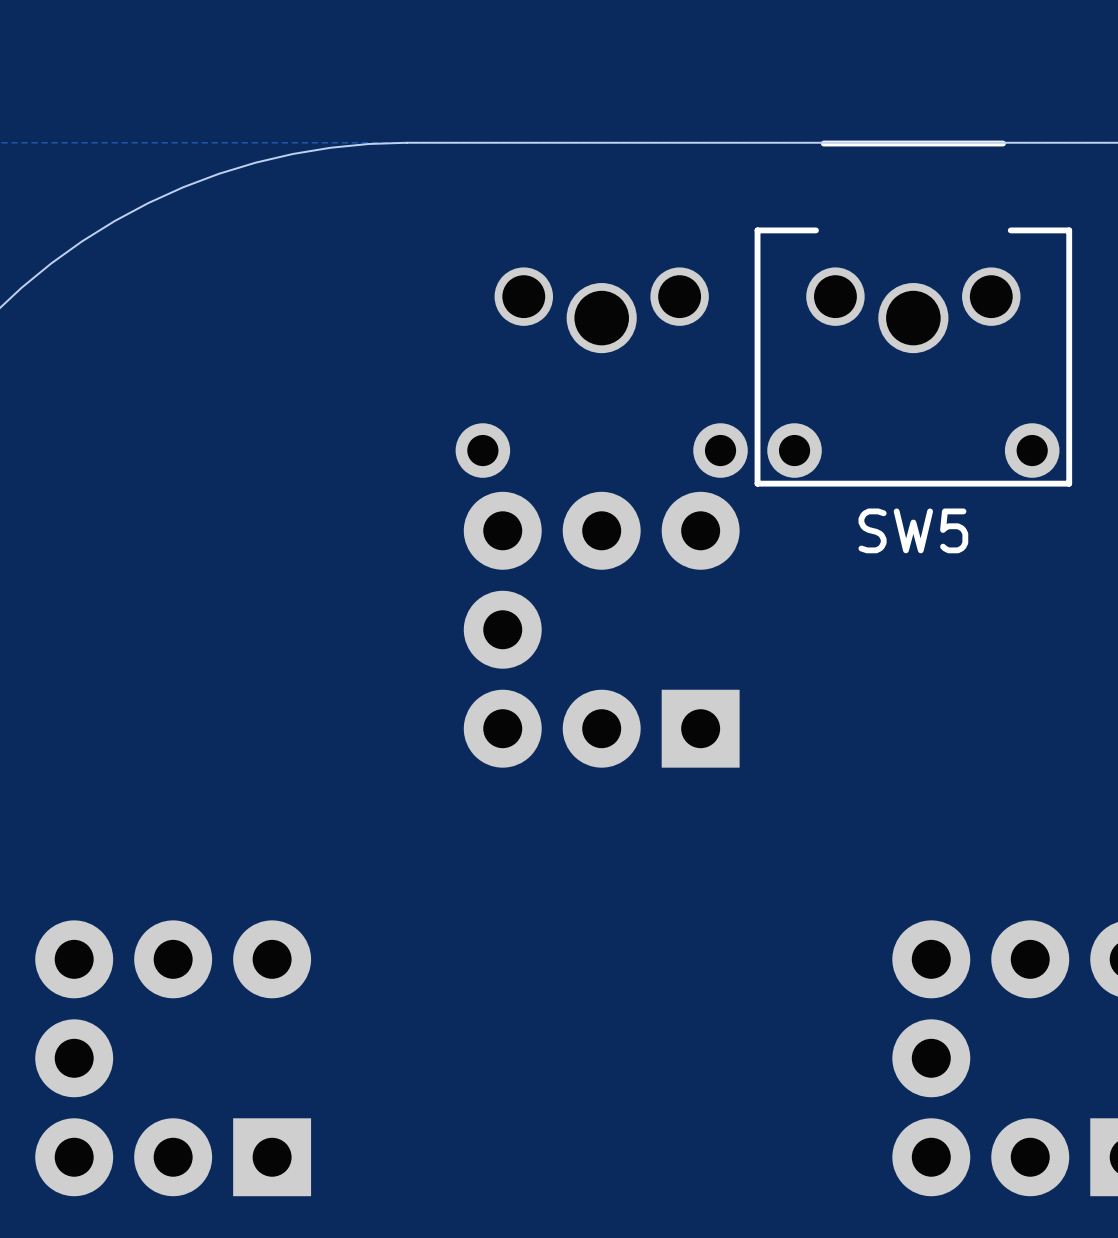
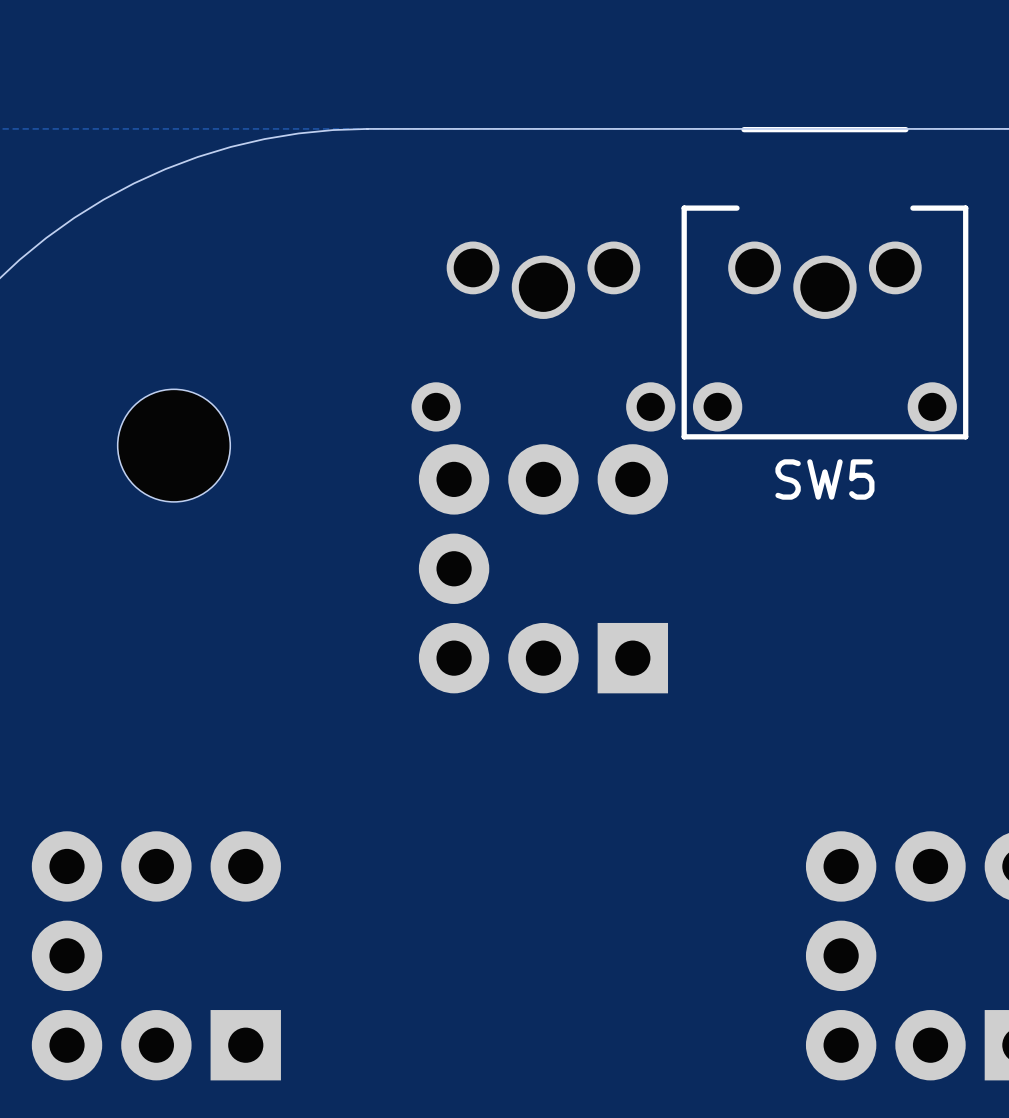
part: none -> (173, 445)

